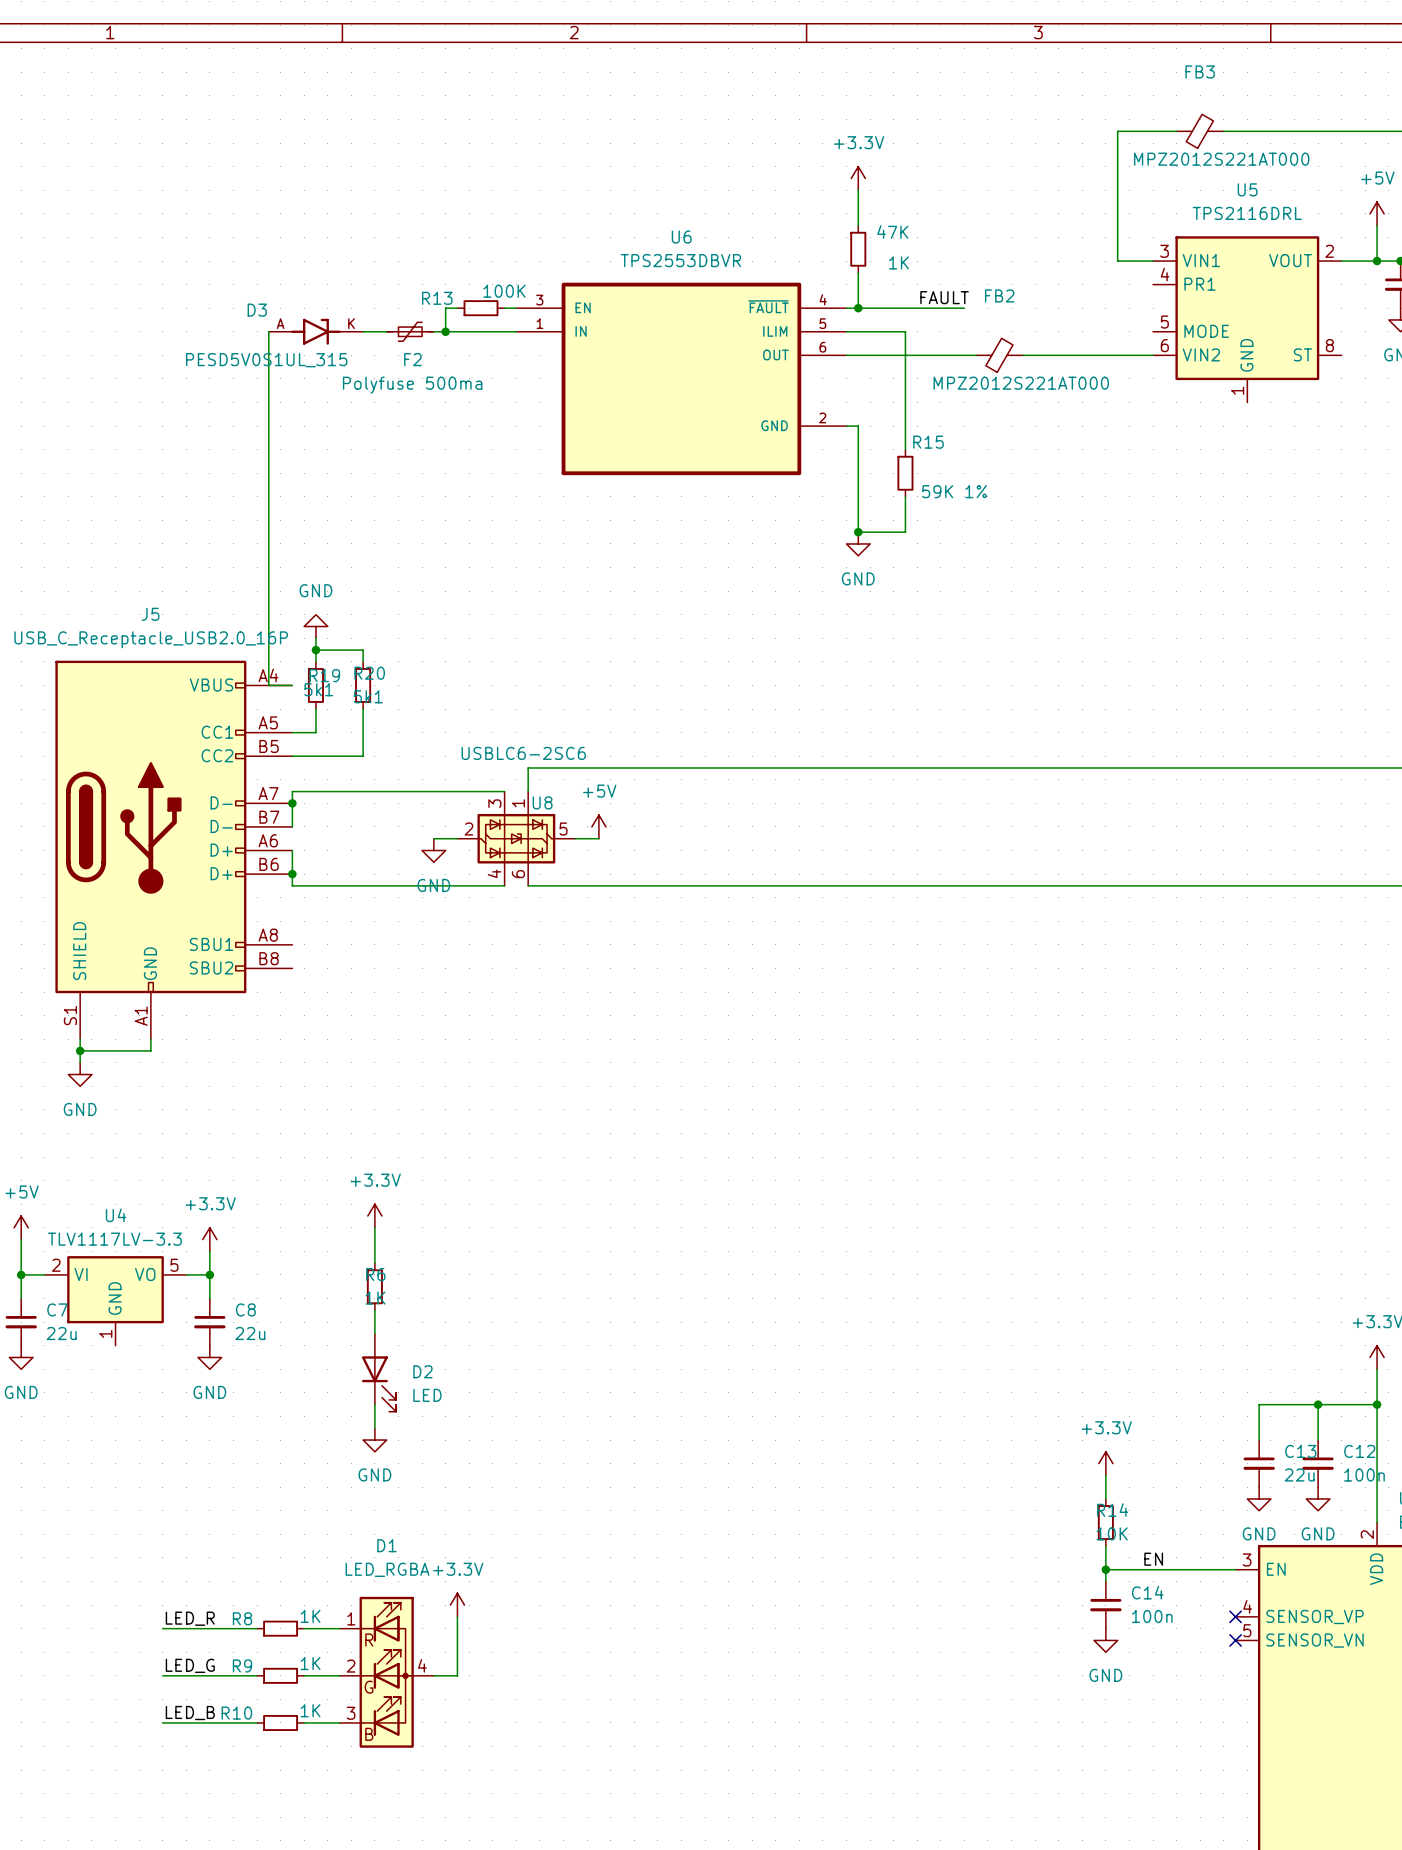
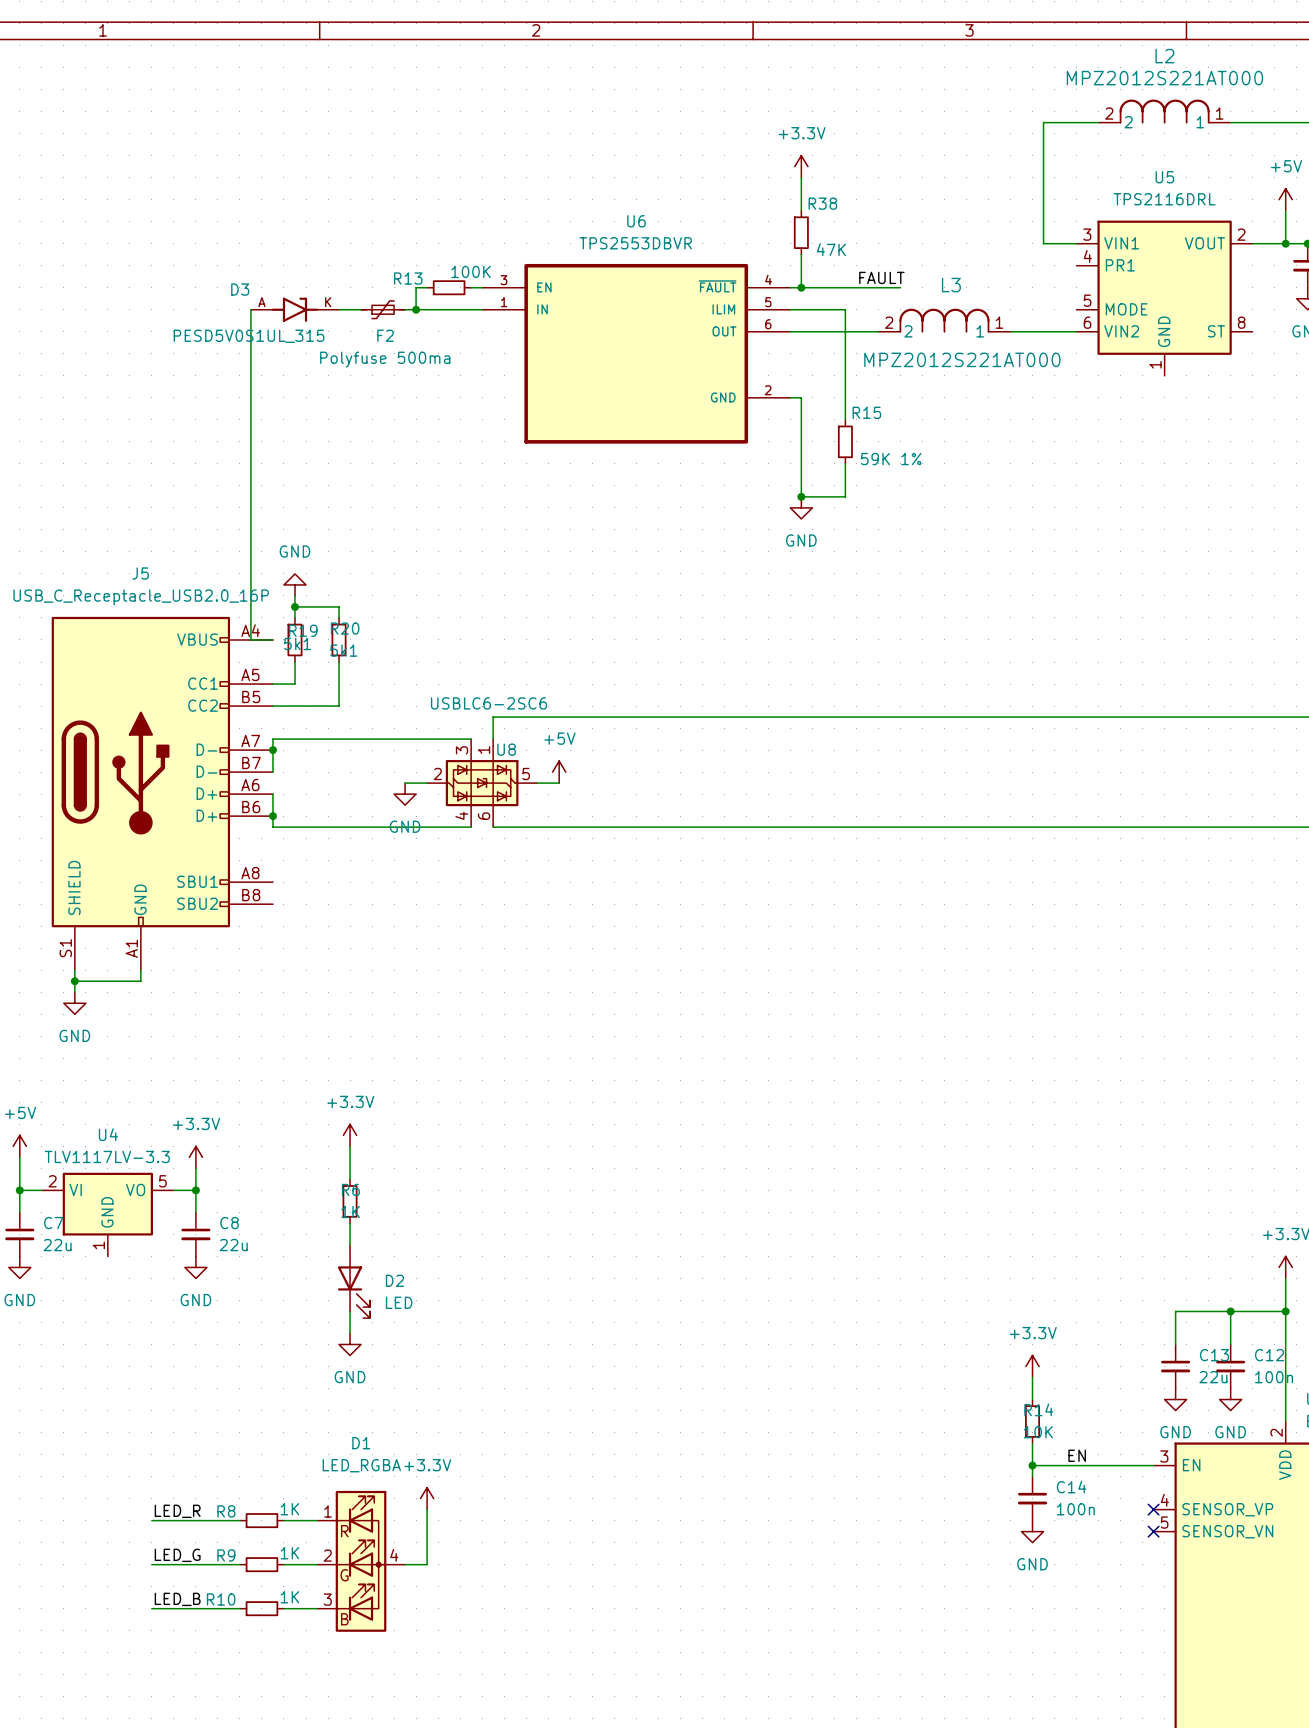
L2: none -> MPZ2012S221AT000 (1164, 111)
FB3: MPZ2012S221AT000 (1200, 131) -> none
wire: (1223, 131) (1318, 131) -> none
47K name: 47K (892, 232) -> R38 (822, 203)
47K value: 1K (899, 262) -> 47K (831, 249)
L3: none -> MPZ2012S221AT000 (944, 320)
FB2: MPZ2012S221AT000 (999, 355) -> none
wire: (1023, 355) (1082, 355) -> none

